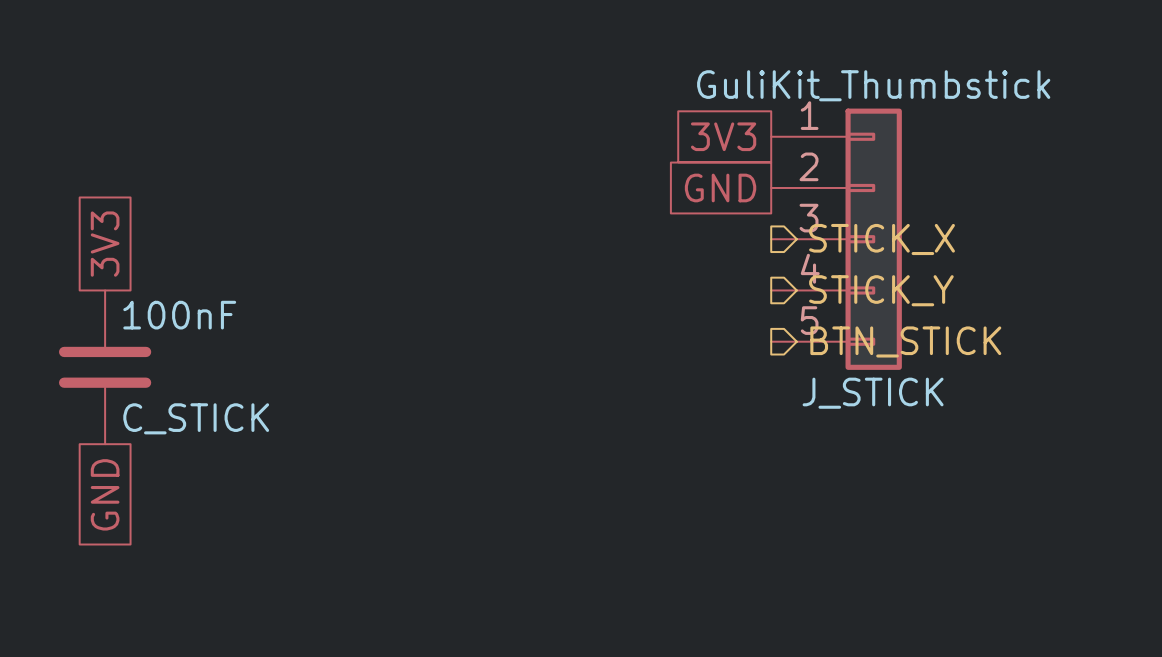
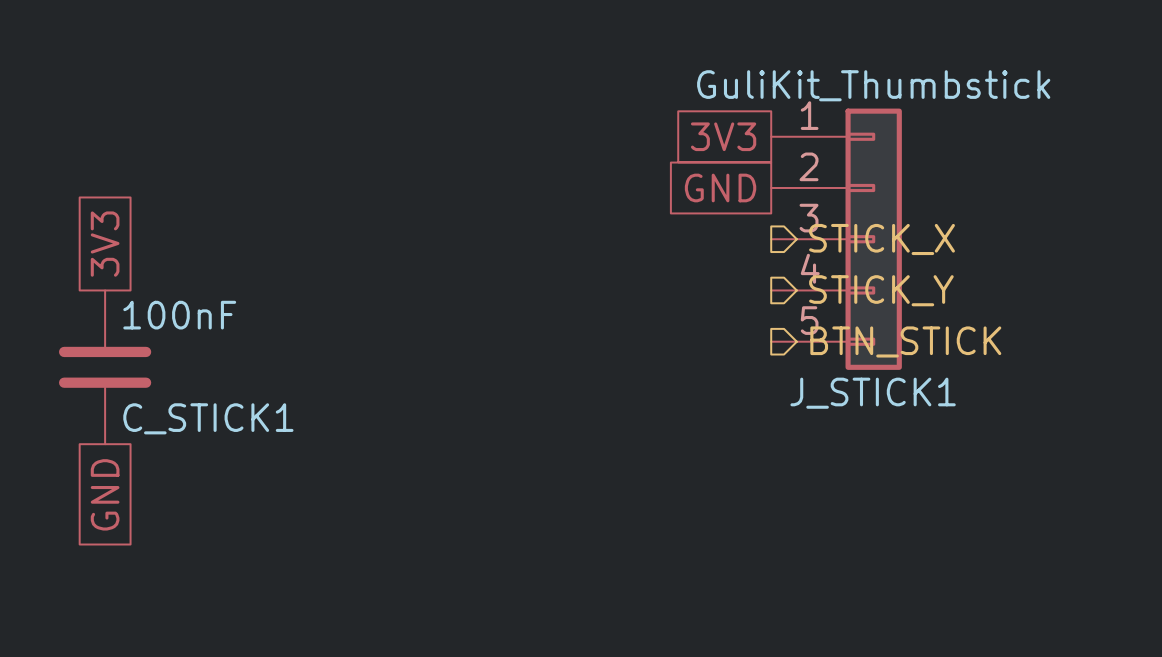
J_STICK name: J_STICK (873, 393) -> J_STICK1 (873, 393)
C_STICK name: C_STICK (196, 418) -> C_STICK1 (208, 418)

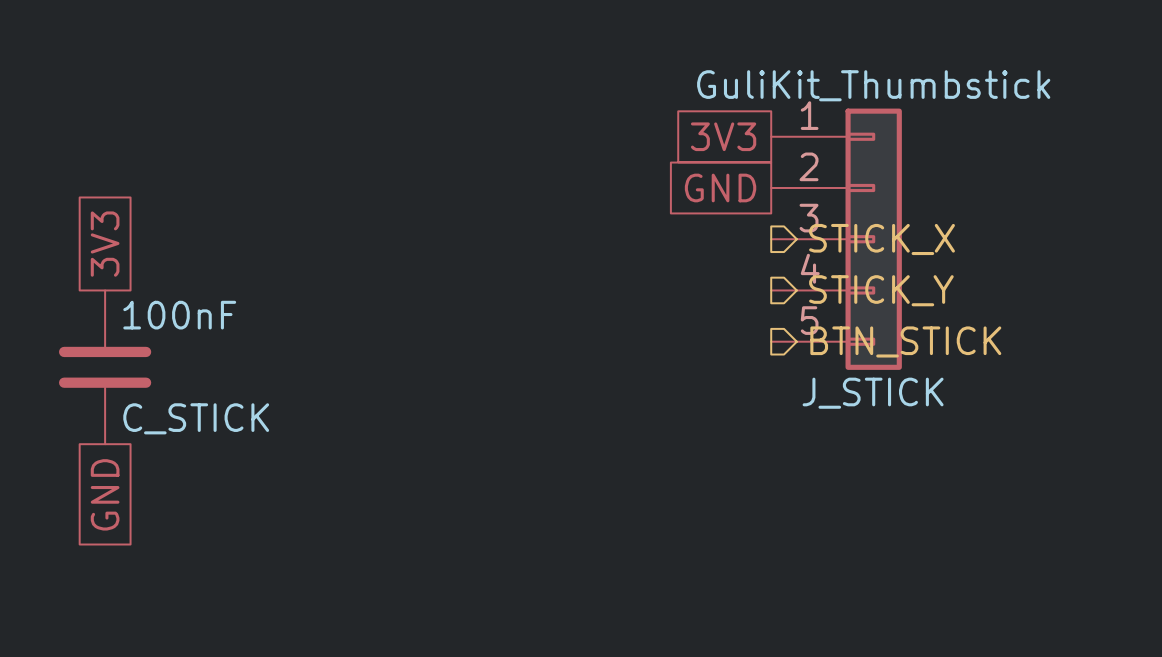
J_STICK1 name: J_STICK1 (873, 393) -> J_STICK (873, 393)
C_STICK1 name: C_STICK1 (208, 418) -> C_STICK (196, 418)

